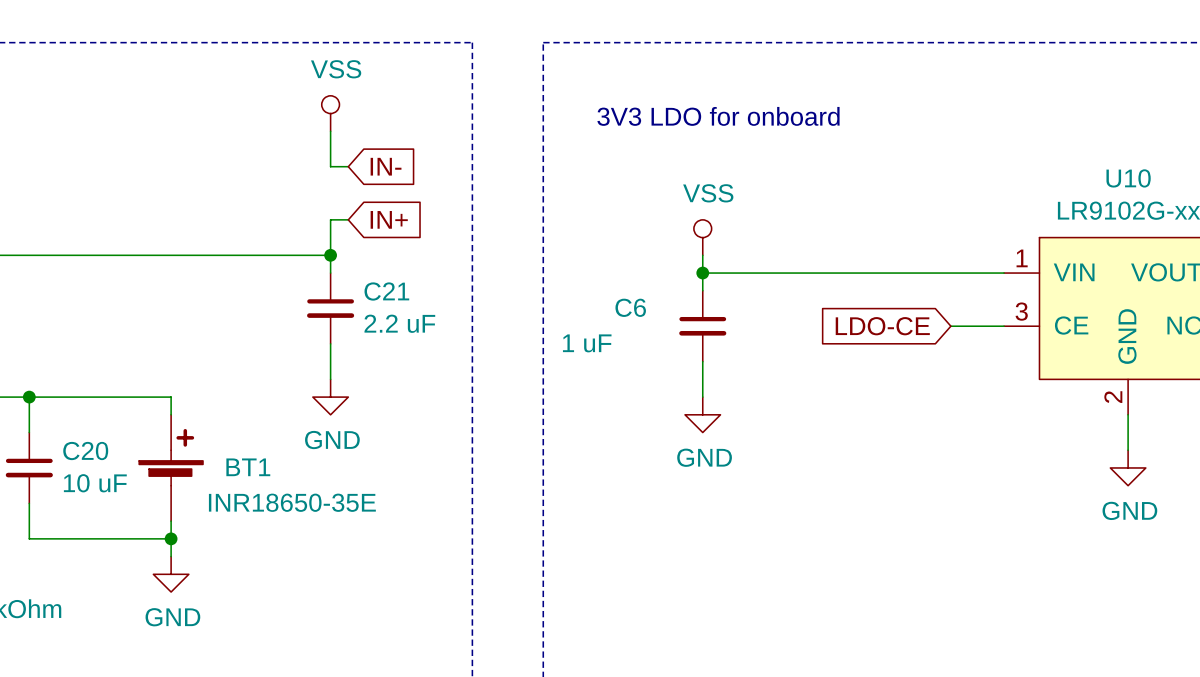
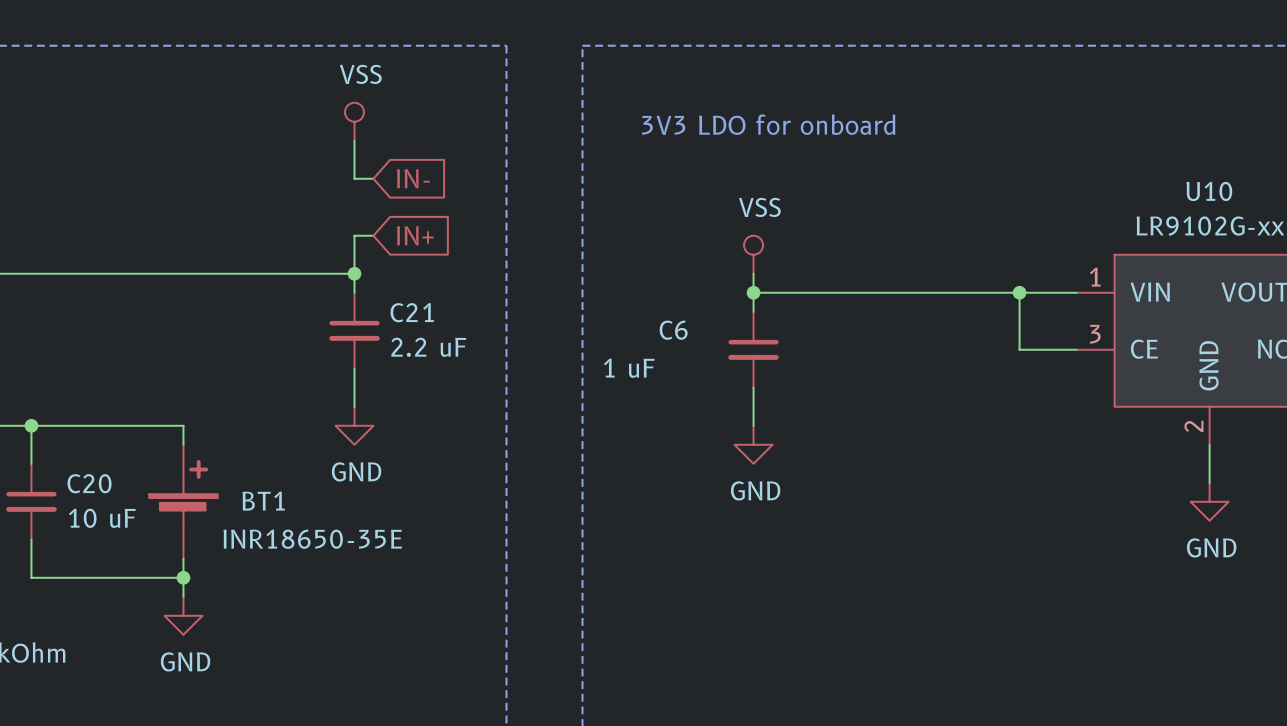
wire: none -> (1019, 292) (1019, 349)
junction: none -> (1019, 292)
global label: LDO-CE (882, 326) -> none

